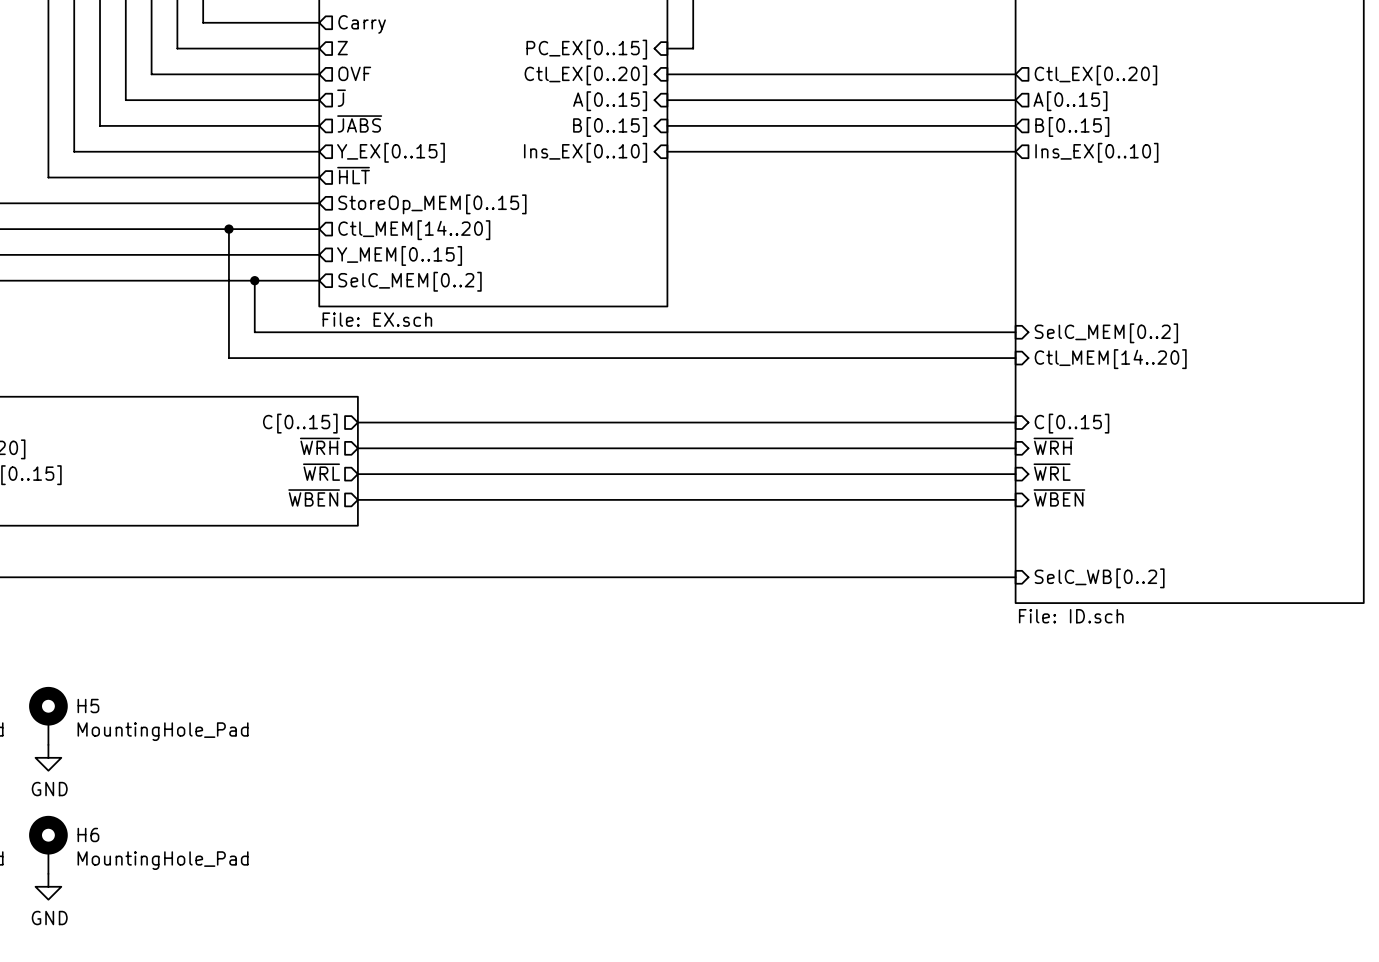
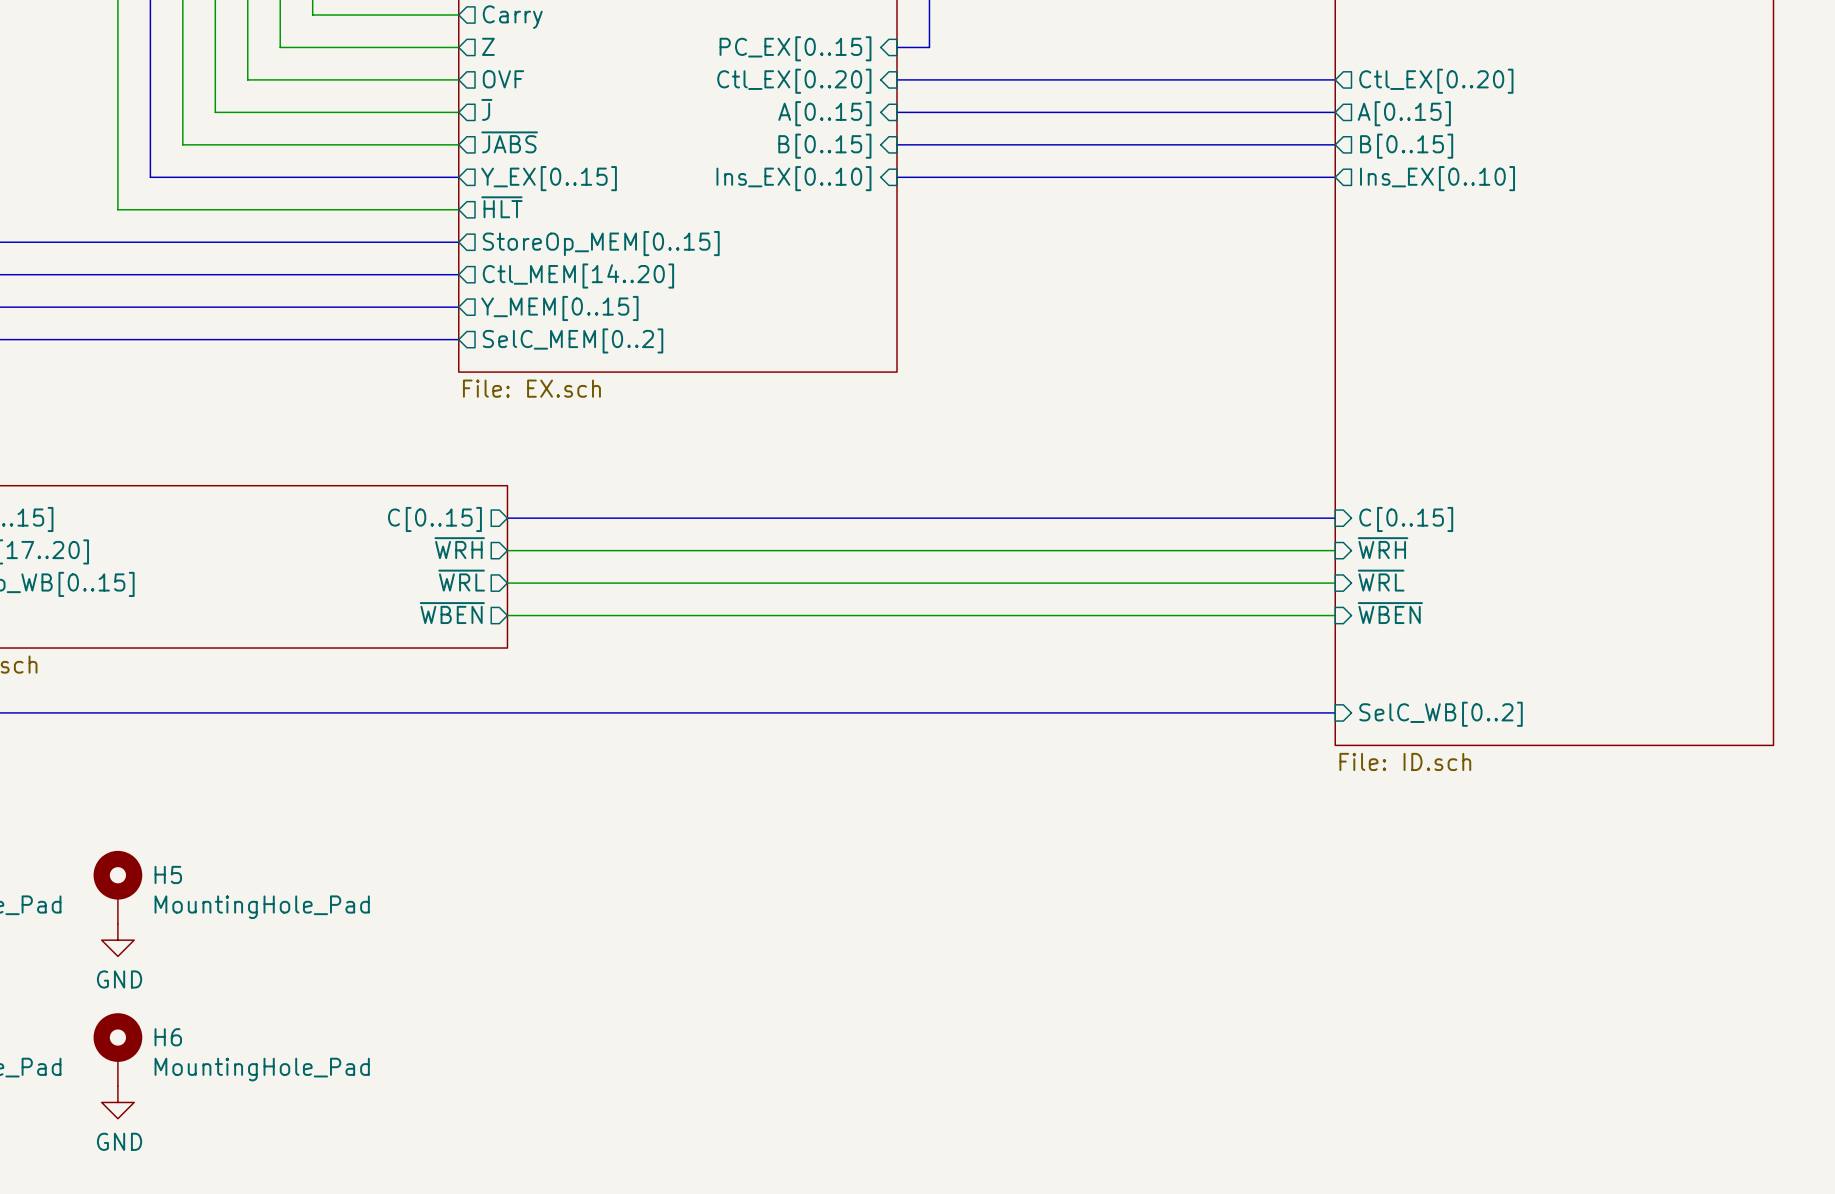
bus: (228, 229) (228, 358) (1015, 358) -> none
junction: (228, 229) -> none
bus: (254, 280) (254, 332) (1015, 332) -> none
junction: (254, 280) -> none
sheet pin: SelC_MEM[0..2] (1106, 333) -> none
sheet pin: Ctl_MEM[14..20] (1110, 359) -> none

